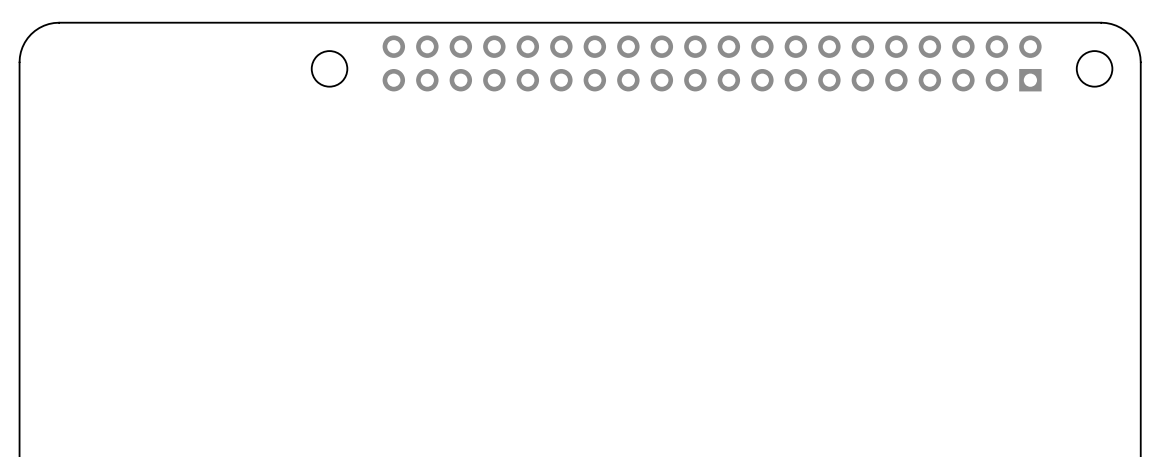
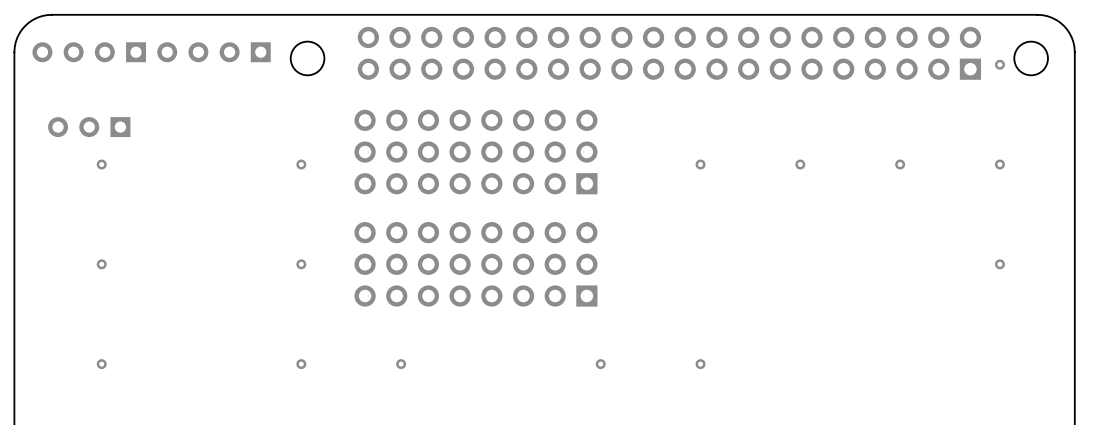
part: none -> (89, 52)
part: none -> (214, 52)
via: none -> (999, 64)
part: none -> (89, 127)
part: none -> (475, 152)
via: none -> (101, 164)
via: none -> (301, 164)
via: none -> (700, 164)
via: none -> (800, 164)
via: none -> (900, 164)
via: none -> (999, 164)
via: none -> (101, 264)
via: none -> (301, 264)
part: none -> (475, 264)
via: none -> (999, 264)
via: none -> (101, 364)
via: none -> (301, 364)
via: none -> (401, 364)
via: none -> (600, 364)
via: none -> (700, 364)

